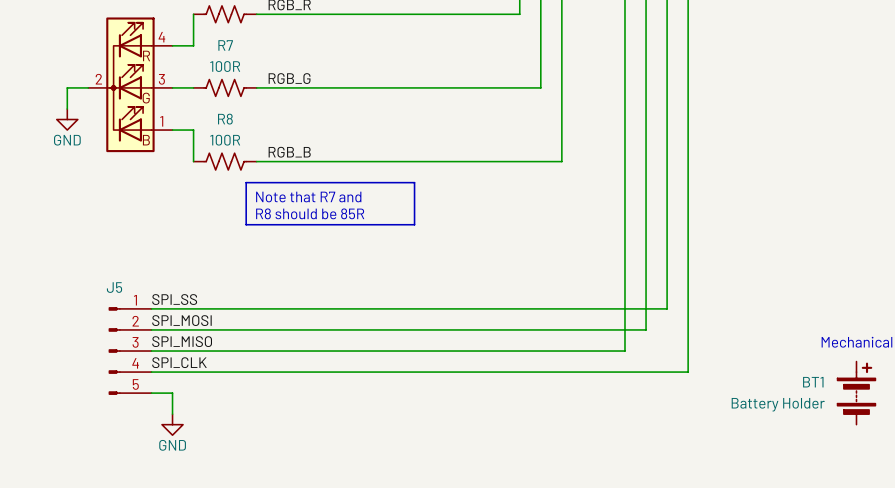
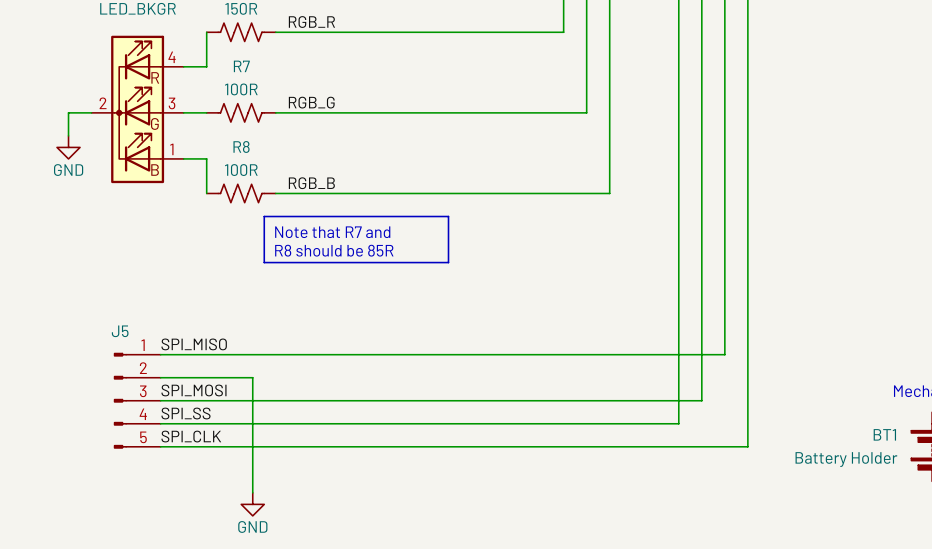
label: SPI_SS (174, 299) -> SPI_MISO (194, 344)
label: SPI_MOSI (181, 320) -> none
wire: (235, 329) (646, 329) -> (252, 377) (252, 492)
label: SPI_MISO (182, 341) -> SPI_MOSI (194, 390)
label: SPI_CLK (179, 362) -> SPI_SS (186, 413)
wire: (624, 372) (688, 372) -> (678, 423) (678, 400) (701, 400) (701, 377)
label: none -> SPI_CLK (191, 436)
wire: (172, 393) (172, 414) -> (183, 446) (747, 446) (747, 423)
power symbol position: GND (172, 424) -> GND (252, 504)

